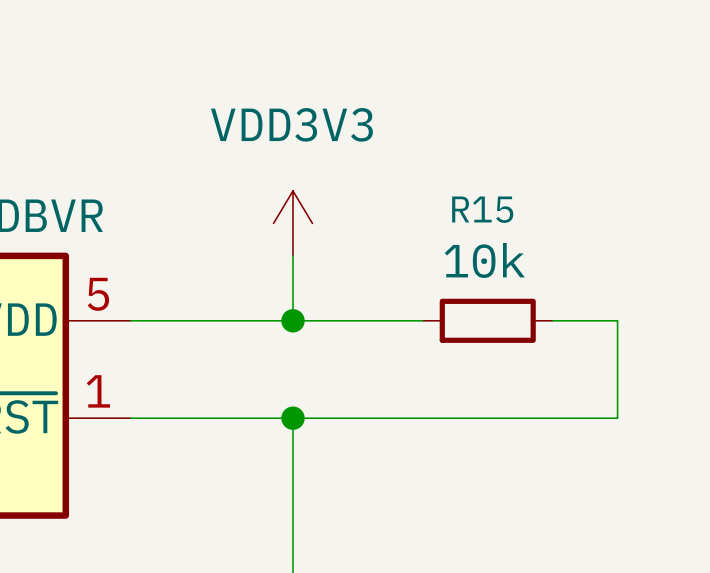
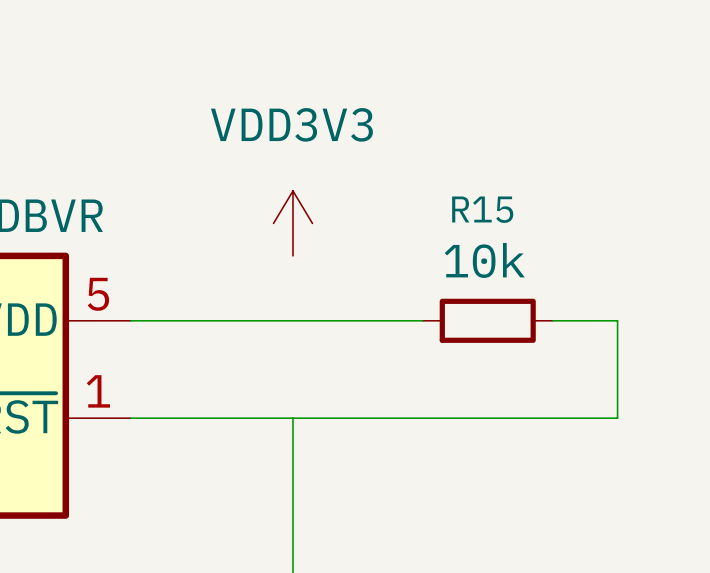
wire: (293, 255) (293, 320) -> none
junction: (293, 320) -> none
junction: (293, 418) -> none

